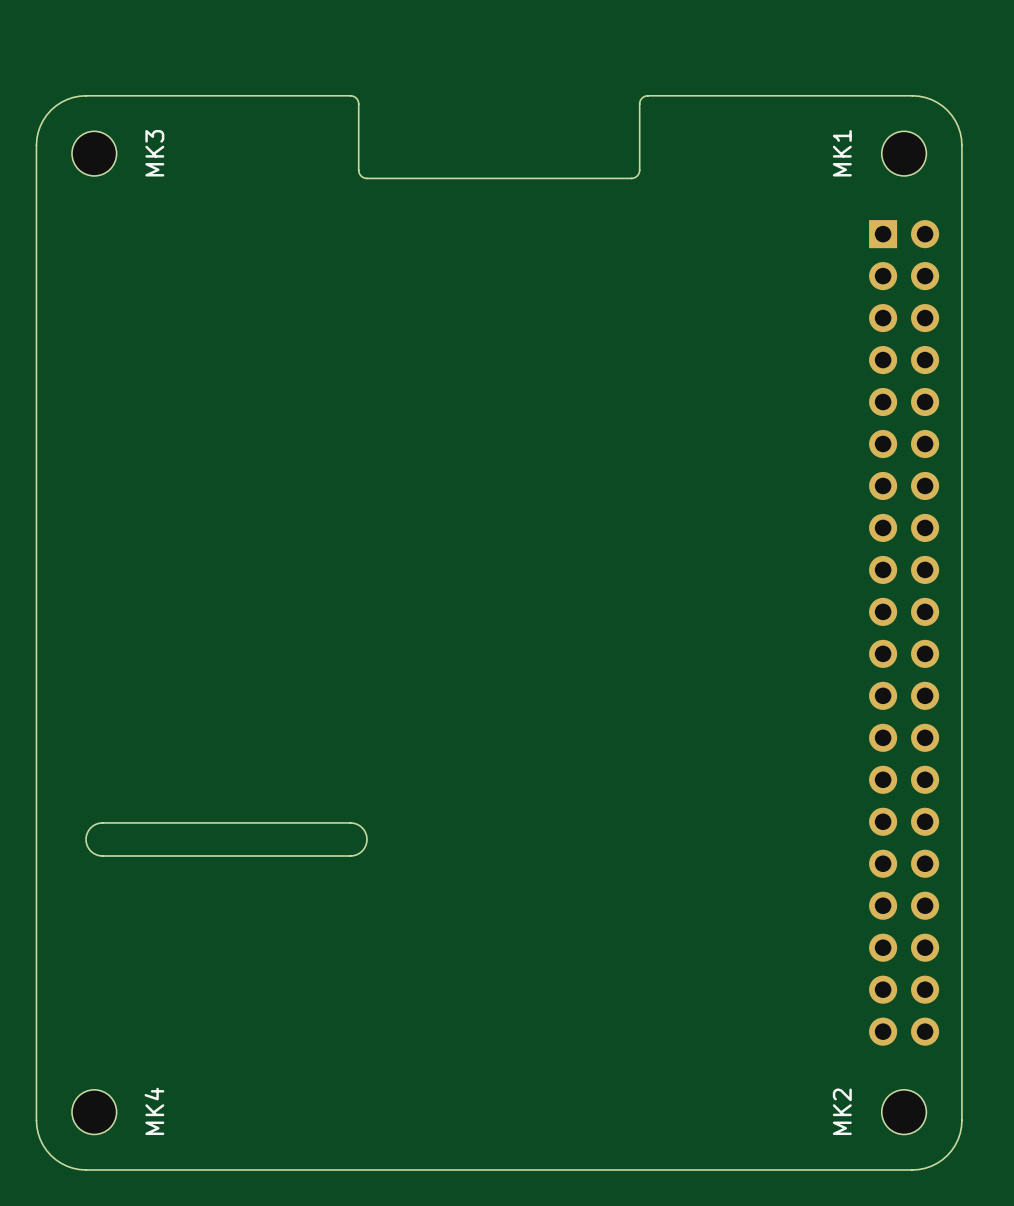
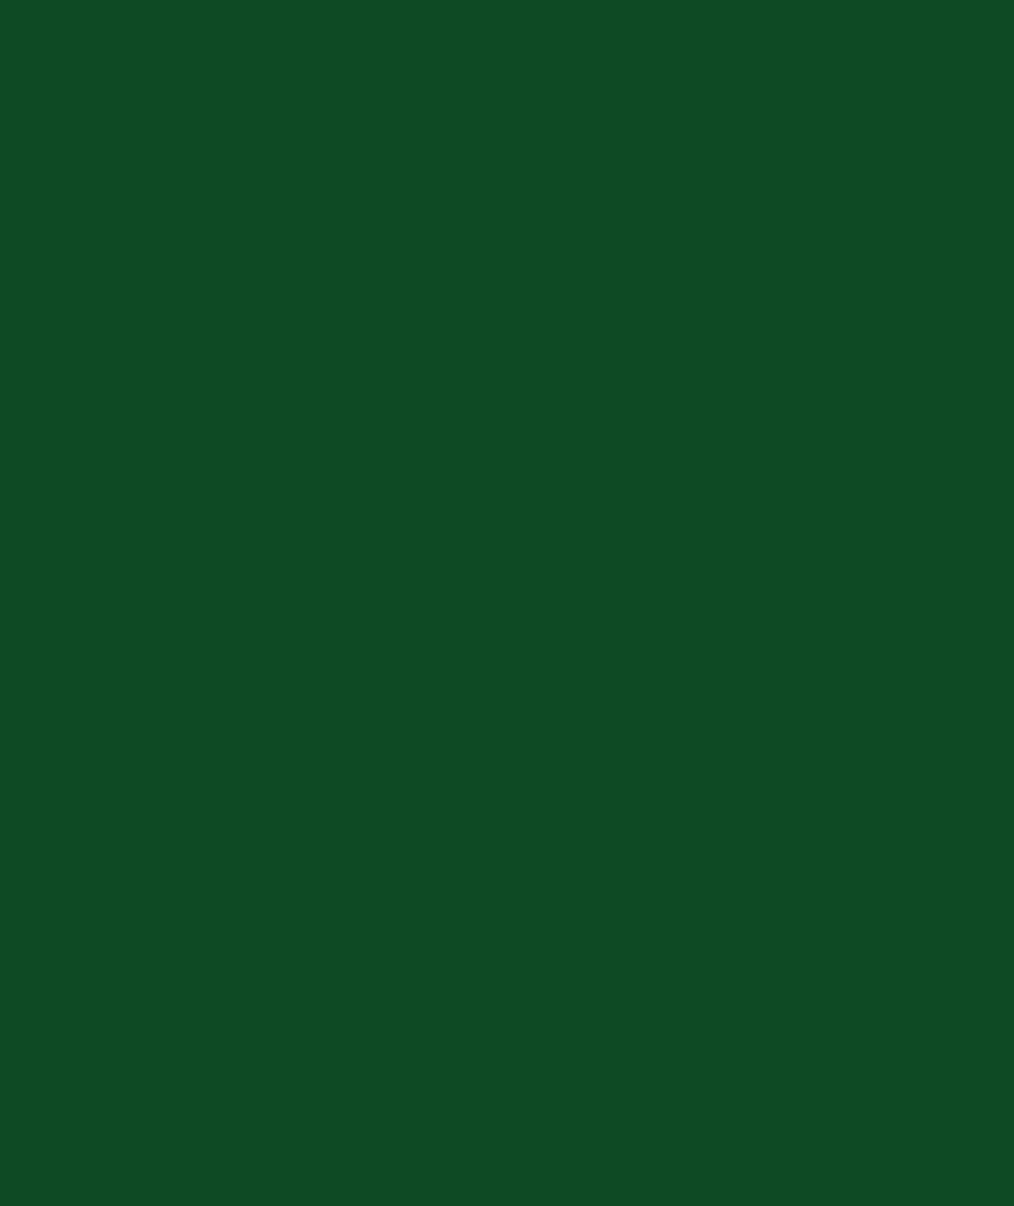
board edge: (86, 95) (352, 96) (358, 102) (358, 171) (361, 176) (366, 178) (633, 178) (639, 171) (639, 102) (642, 98) (646, 95) (912, 95) (931, 99) (942, 106) (951, 115) (958, 126) (961, 145) (961, 1120) (958, 1139) (951, 1150) (942, 1159) (925, 1168) (912, 1169) (86, 1169) (67, 1166) (55, 1159) (46, 1150) (38, 1133) (36, 1120) (36, 145) (40, 126) (50, 110) (67, 99) (86, 95) -> none
MK3: (94, 153) -> none
MK1: (904, 153) -> none
part: (904, 632) -> none
board edge: (102, 822) (352, 823) (363, 829) (366, 841) (360, 852) (350, 856) (100, 855) (90, 851) (86, 839) (90, 827) (102, 822) -> none
MK4: (94, 1112) -> none
MK2: (904, 1112) -> none

